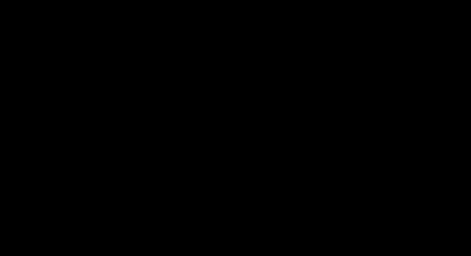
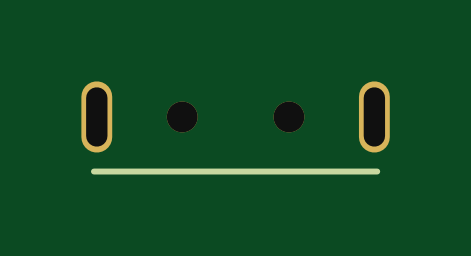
part: none -> (235, 127)

